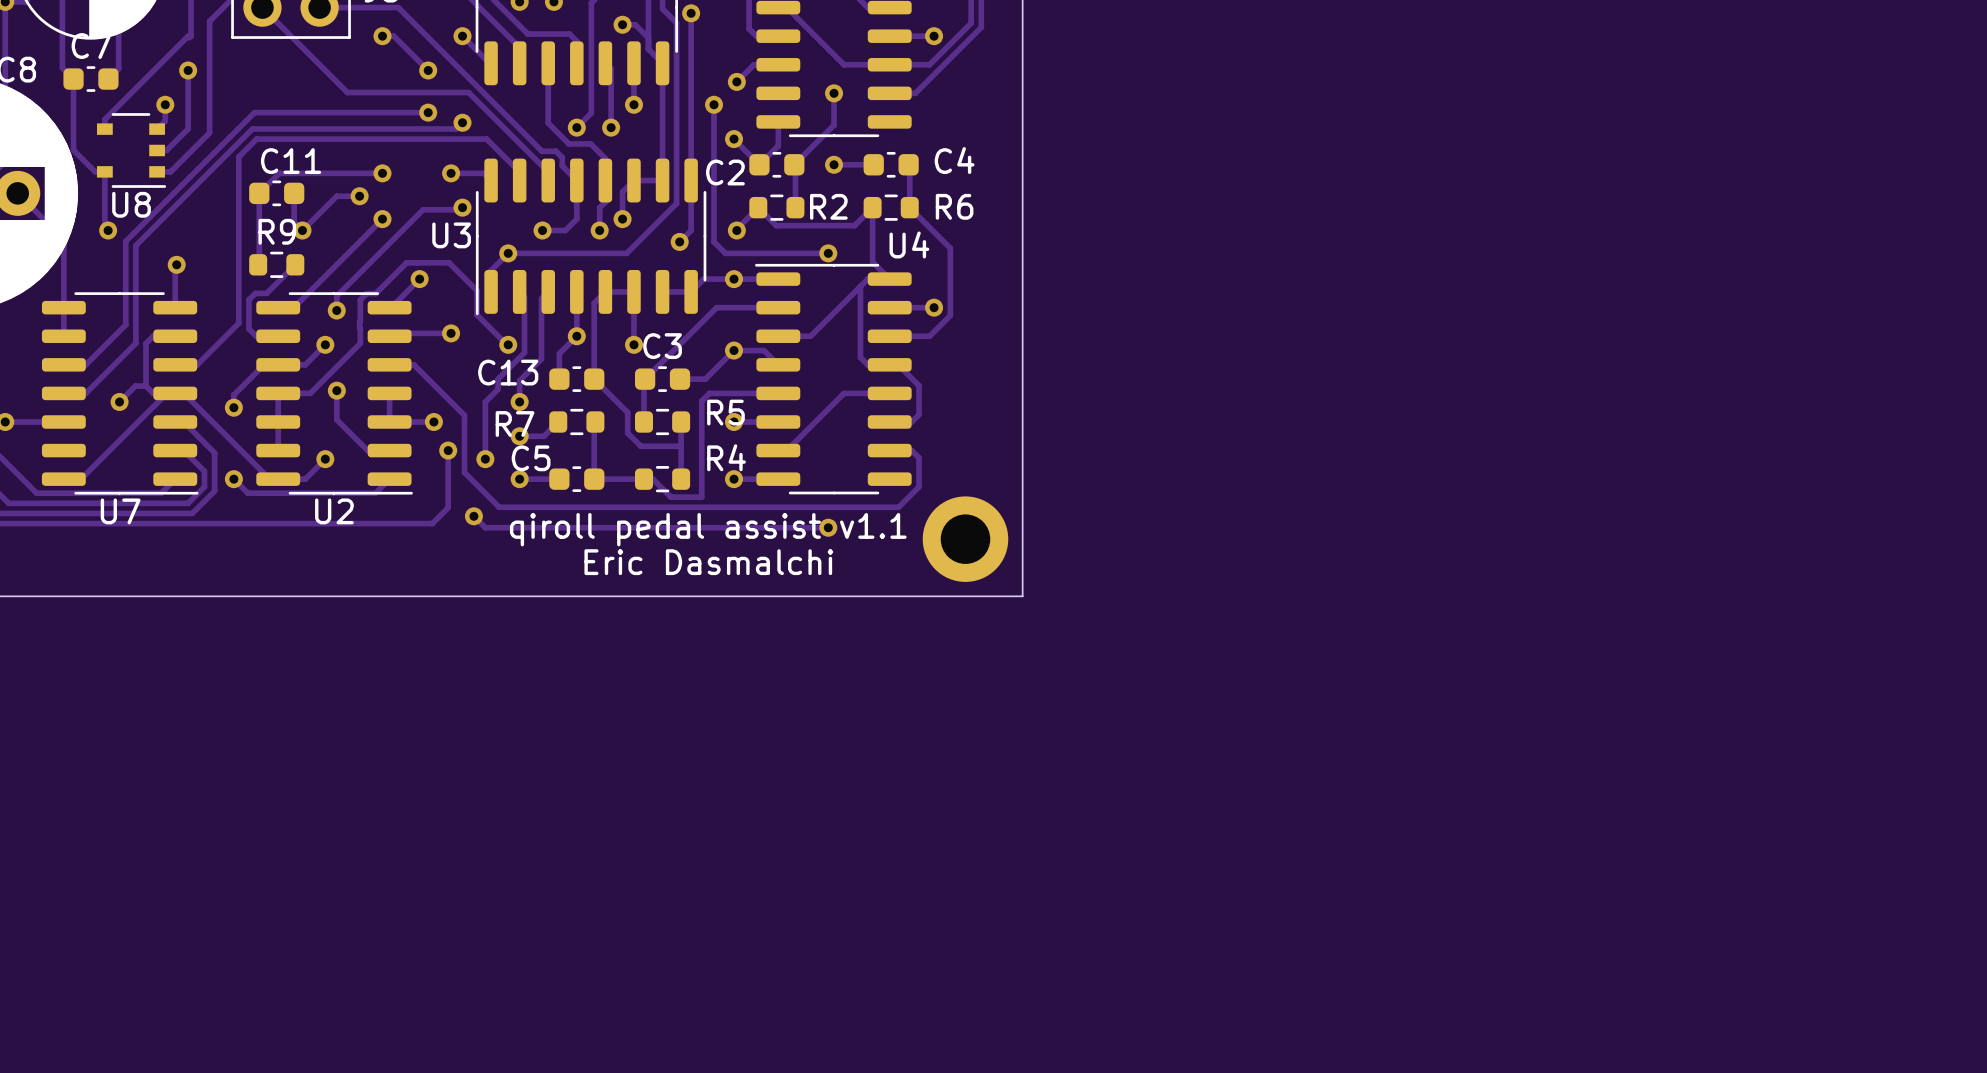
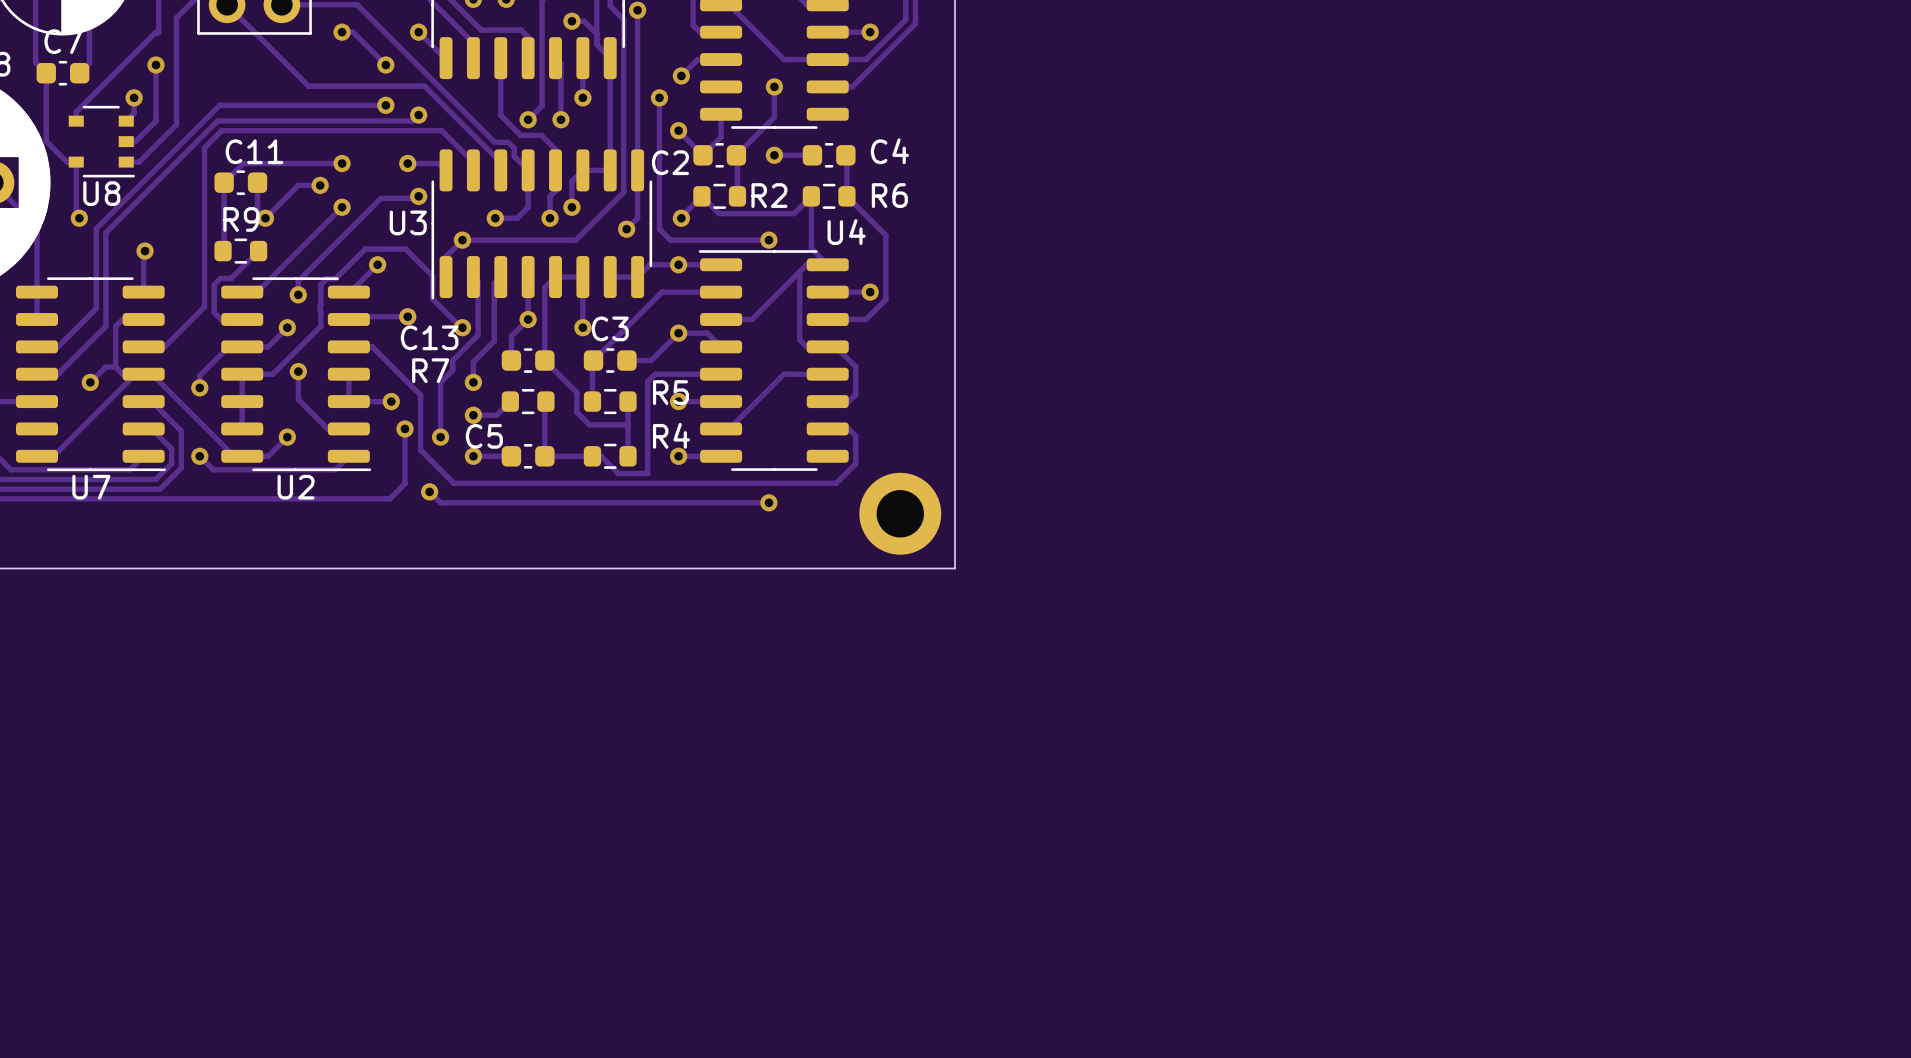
C13 name position: C13 (508, 372) -> C13 (429, 337)
R7 name position: R7 (515, 424) -> R7 (430, 370)
text: qiroll pedal assist v1.1 (708, 529) -> none
text: Eric Dasmalchi (708, 562) -> none

